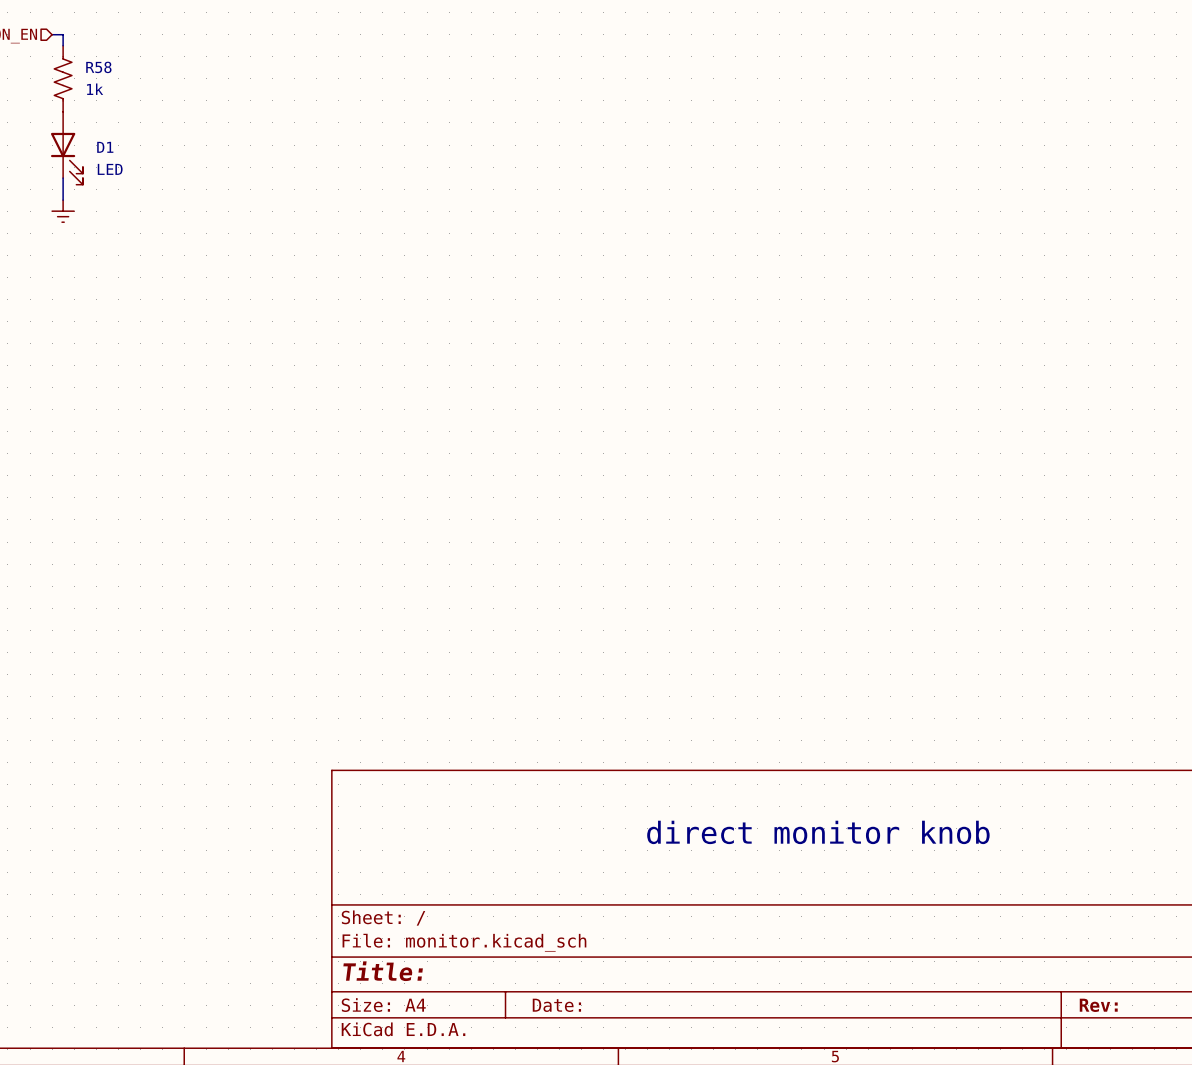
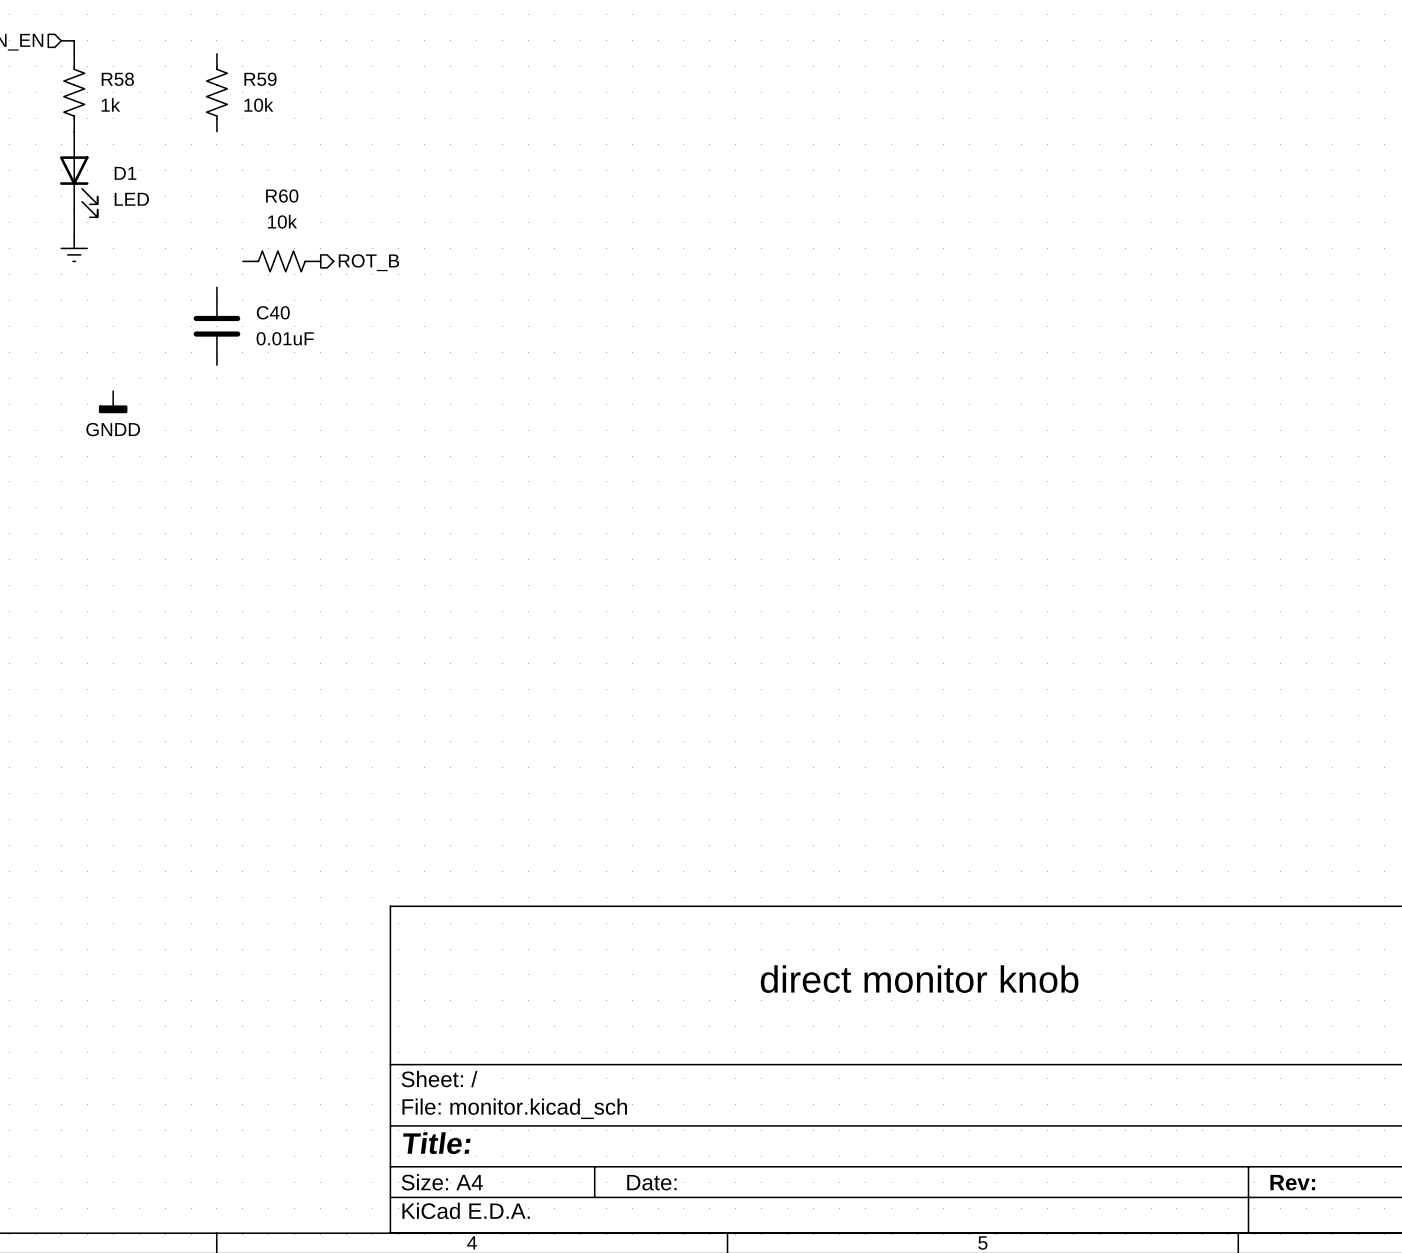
R59: none -> 10k (216, 92)
R60: none -> 10k (281, 261)
hierarchical label: none -> ROT_B (368, 262)
C40: none -> 0.01uF (216, 326)
power symbol: none -> GNDD (113, 402)

